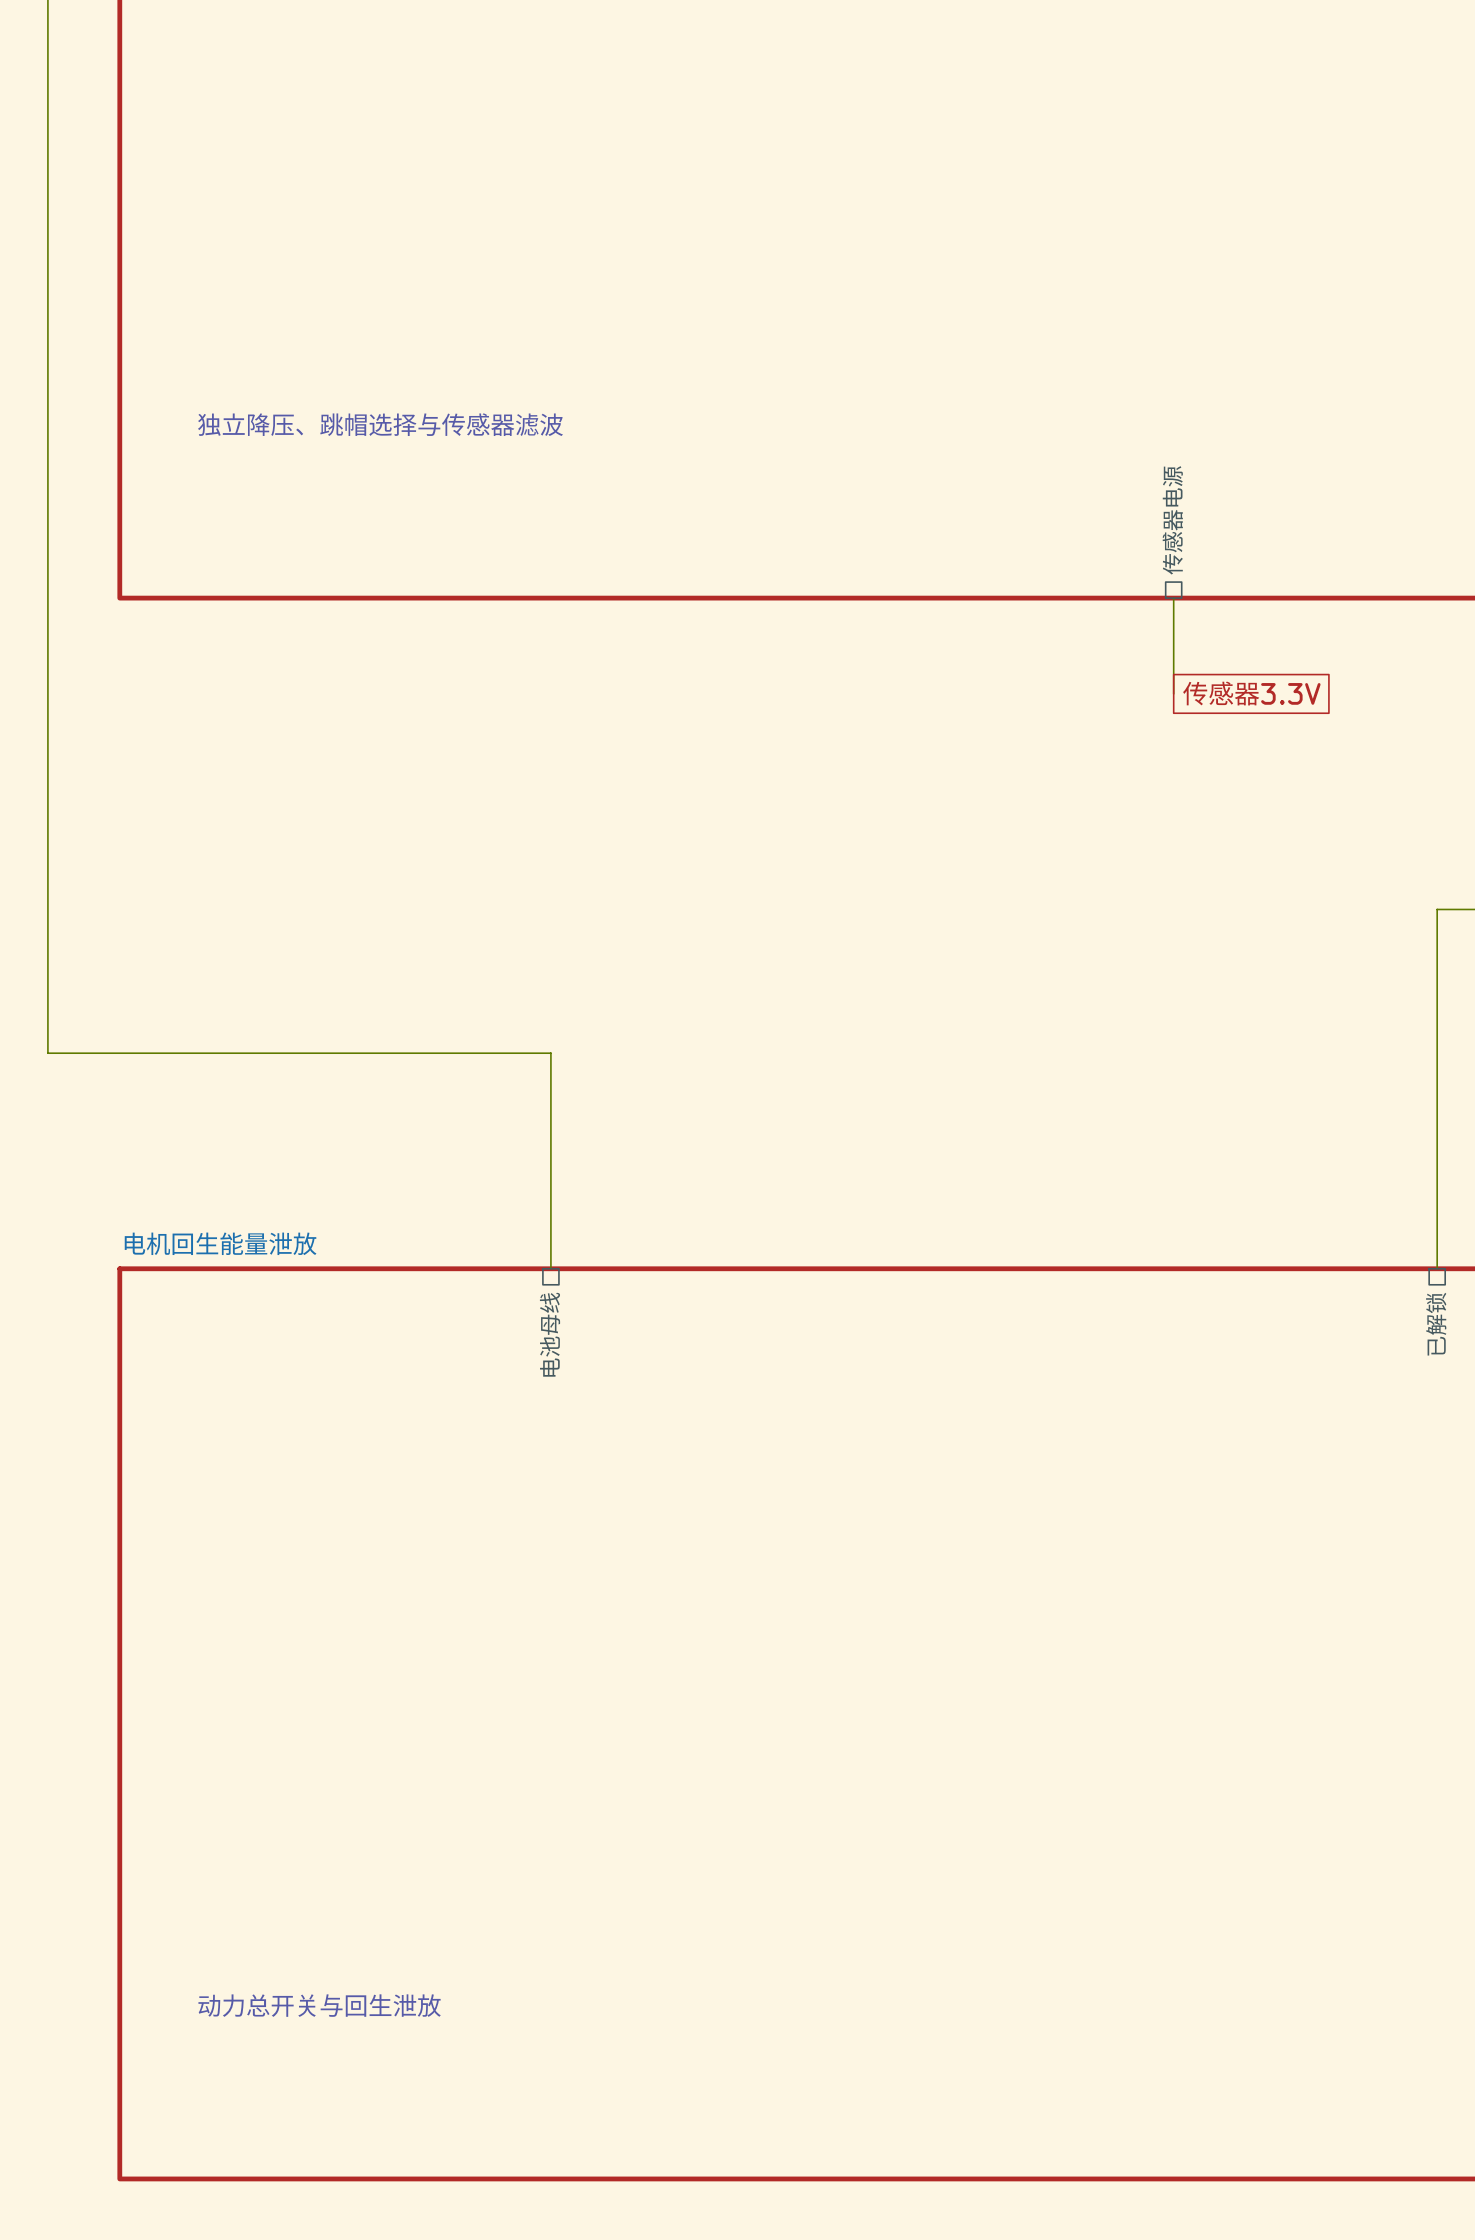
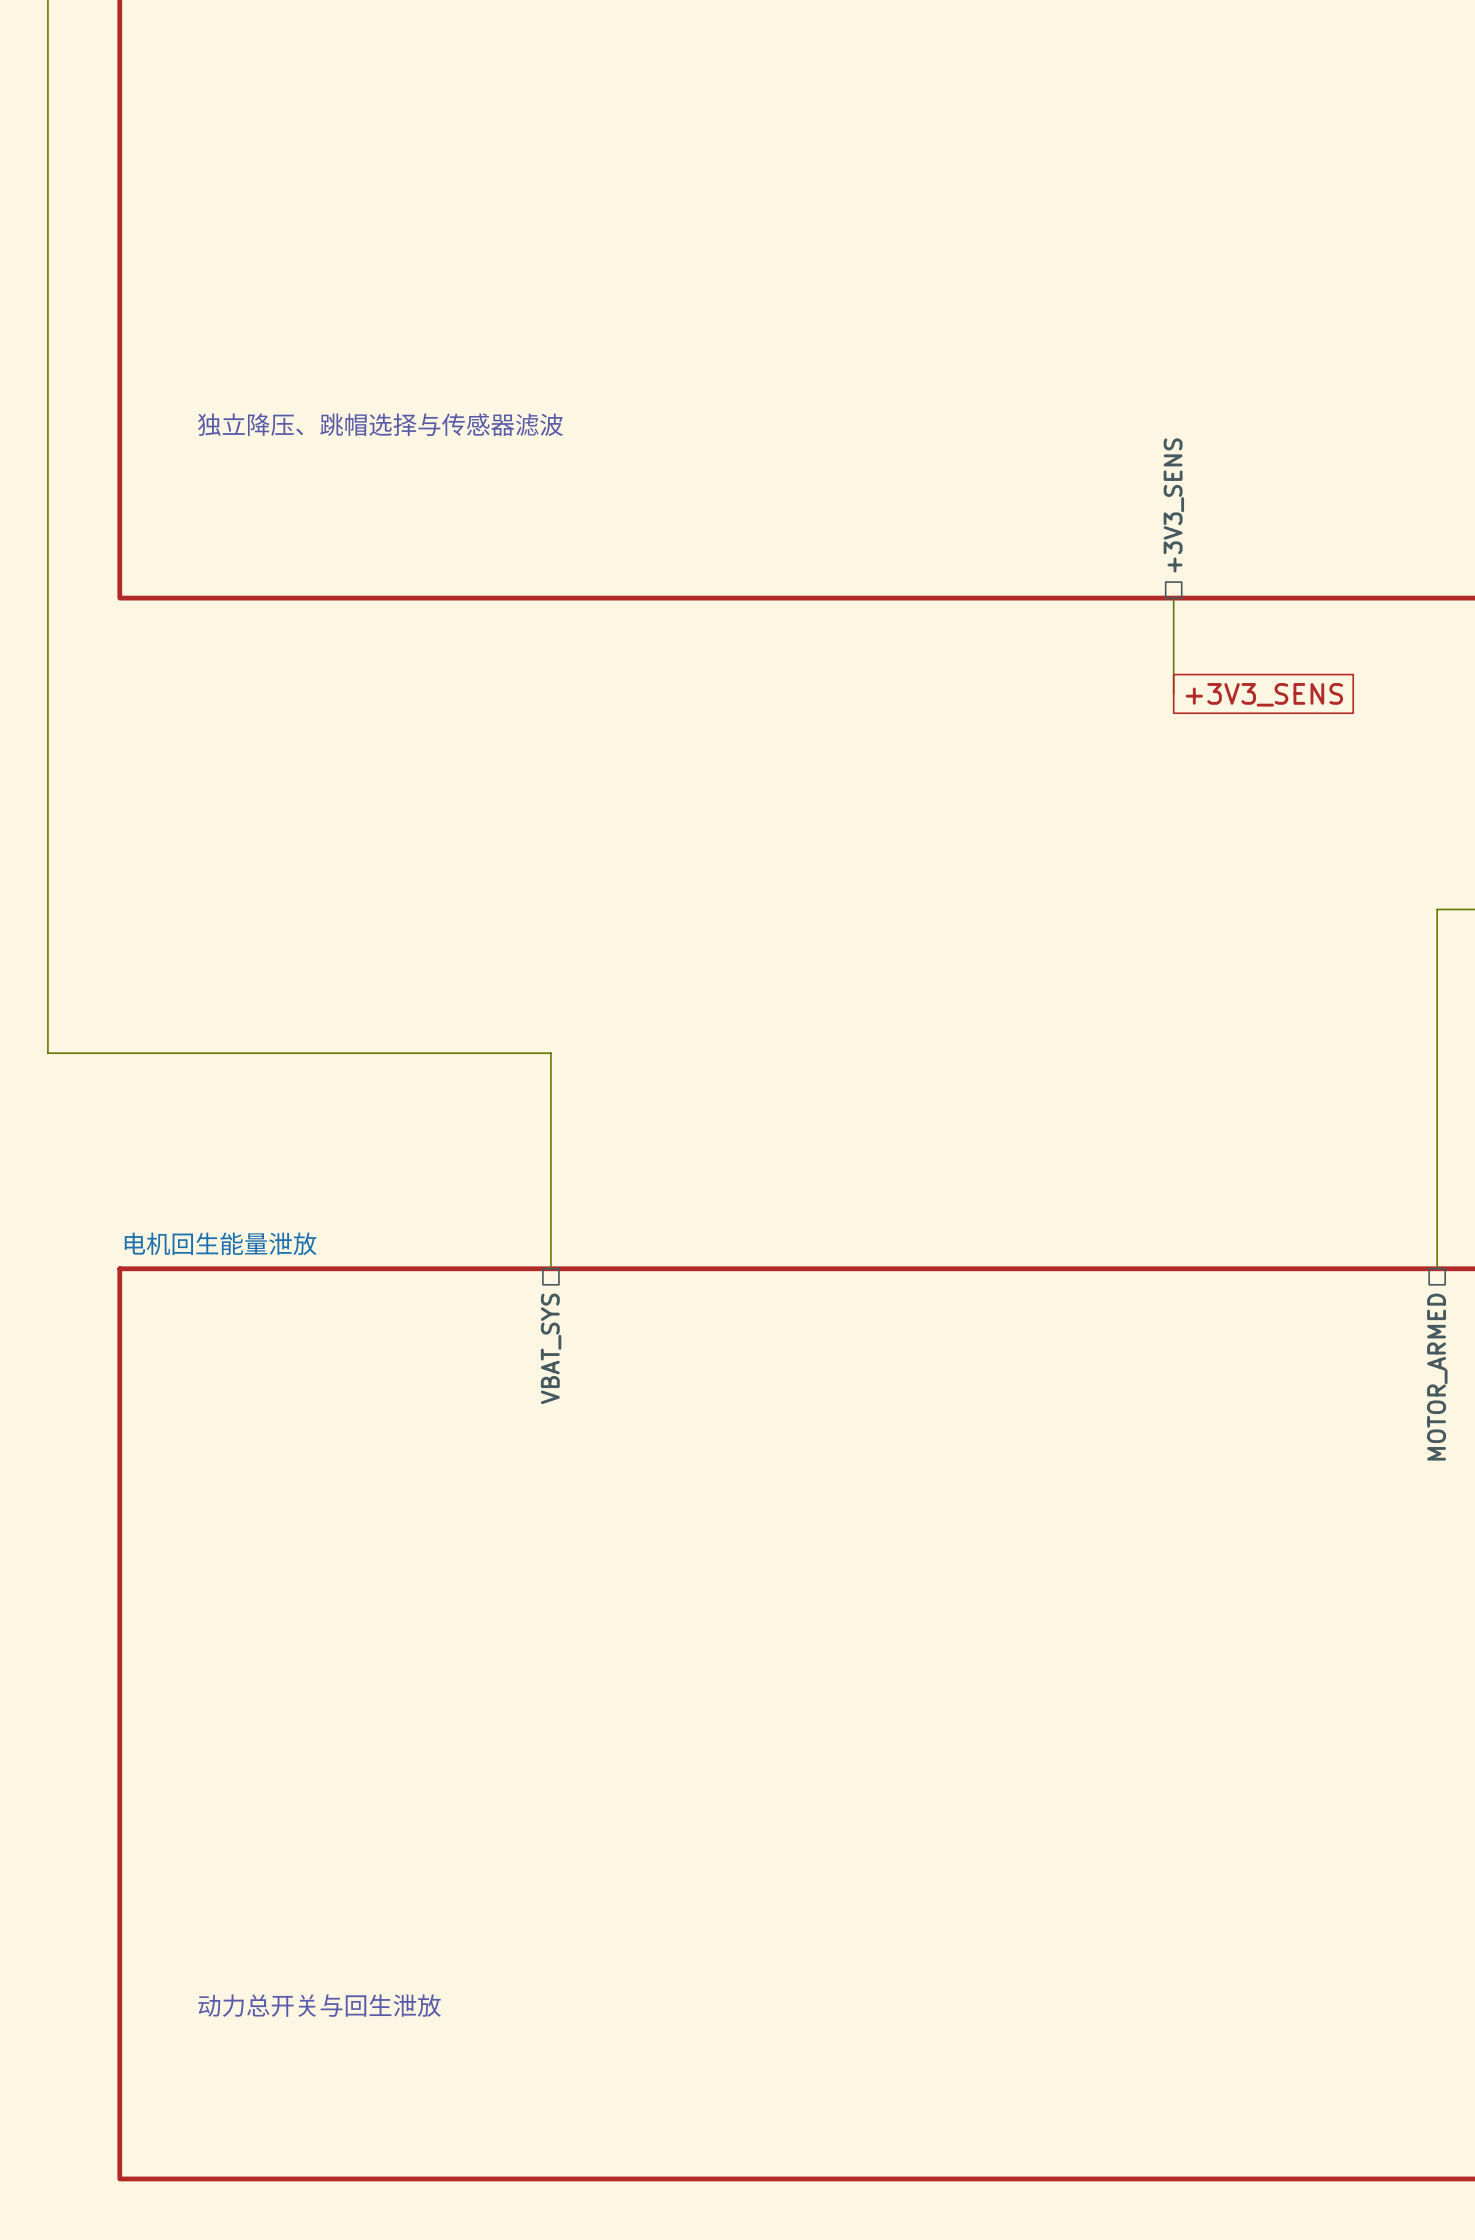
sheet pin: 传感器电源 (1172, 520) -> +3V3_SENS (1173, 505)
global label: 传感器3.3V (1251, 693) -> +3V3_SENS (1264, 694)
sheet pin: 已解锁 (1436, 1324) -> MOTOR_ARMED (1437, 1377)
sheet pin: 电池母线 (550, 1334) -> VBAT_SYS (551, 1348)

